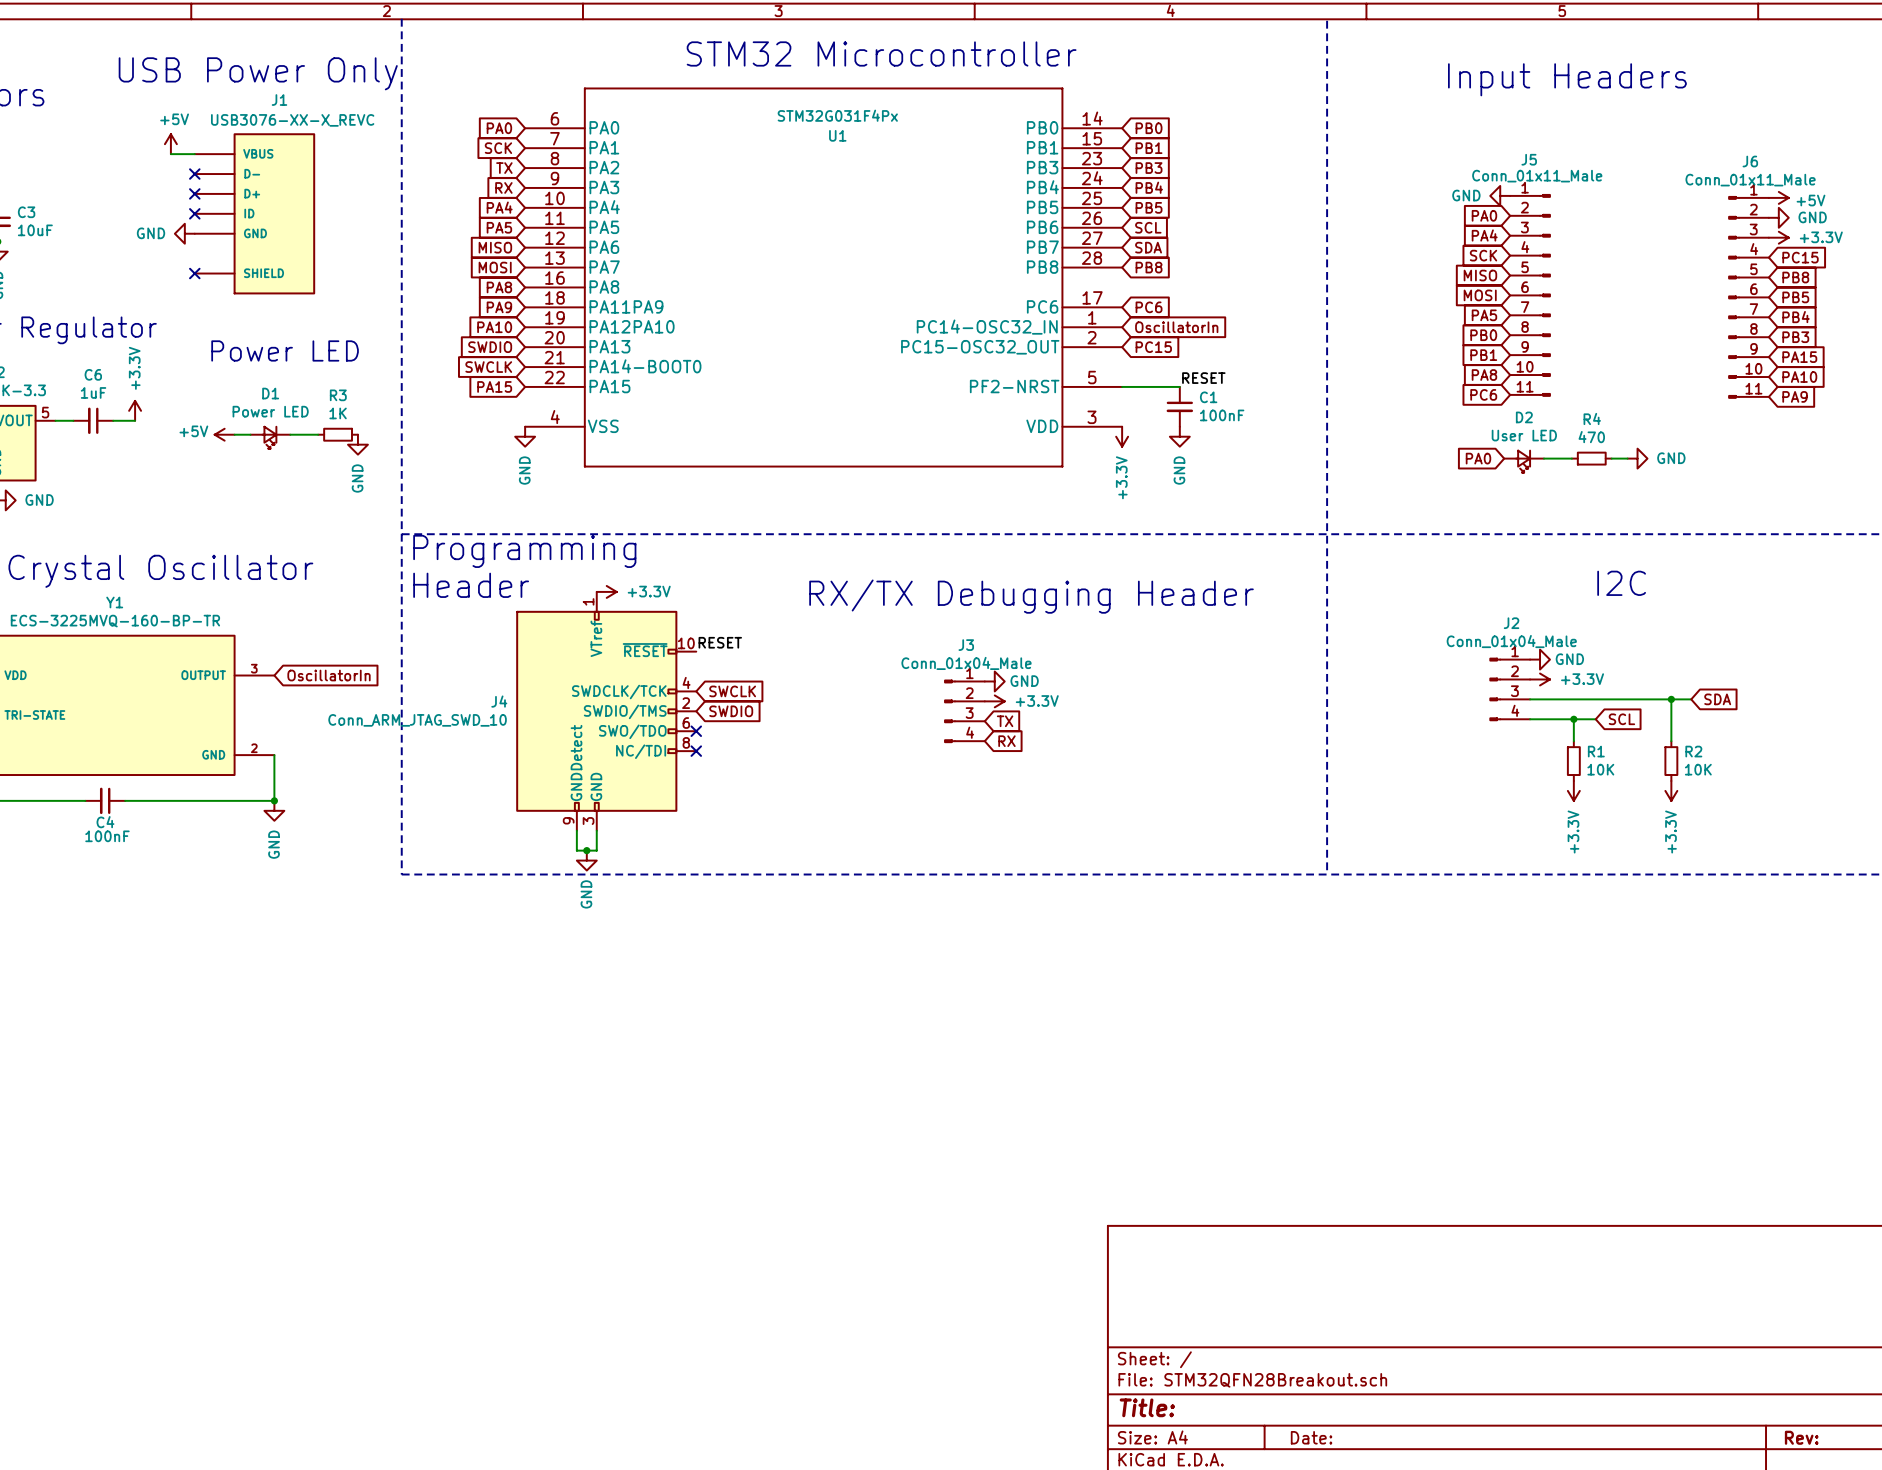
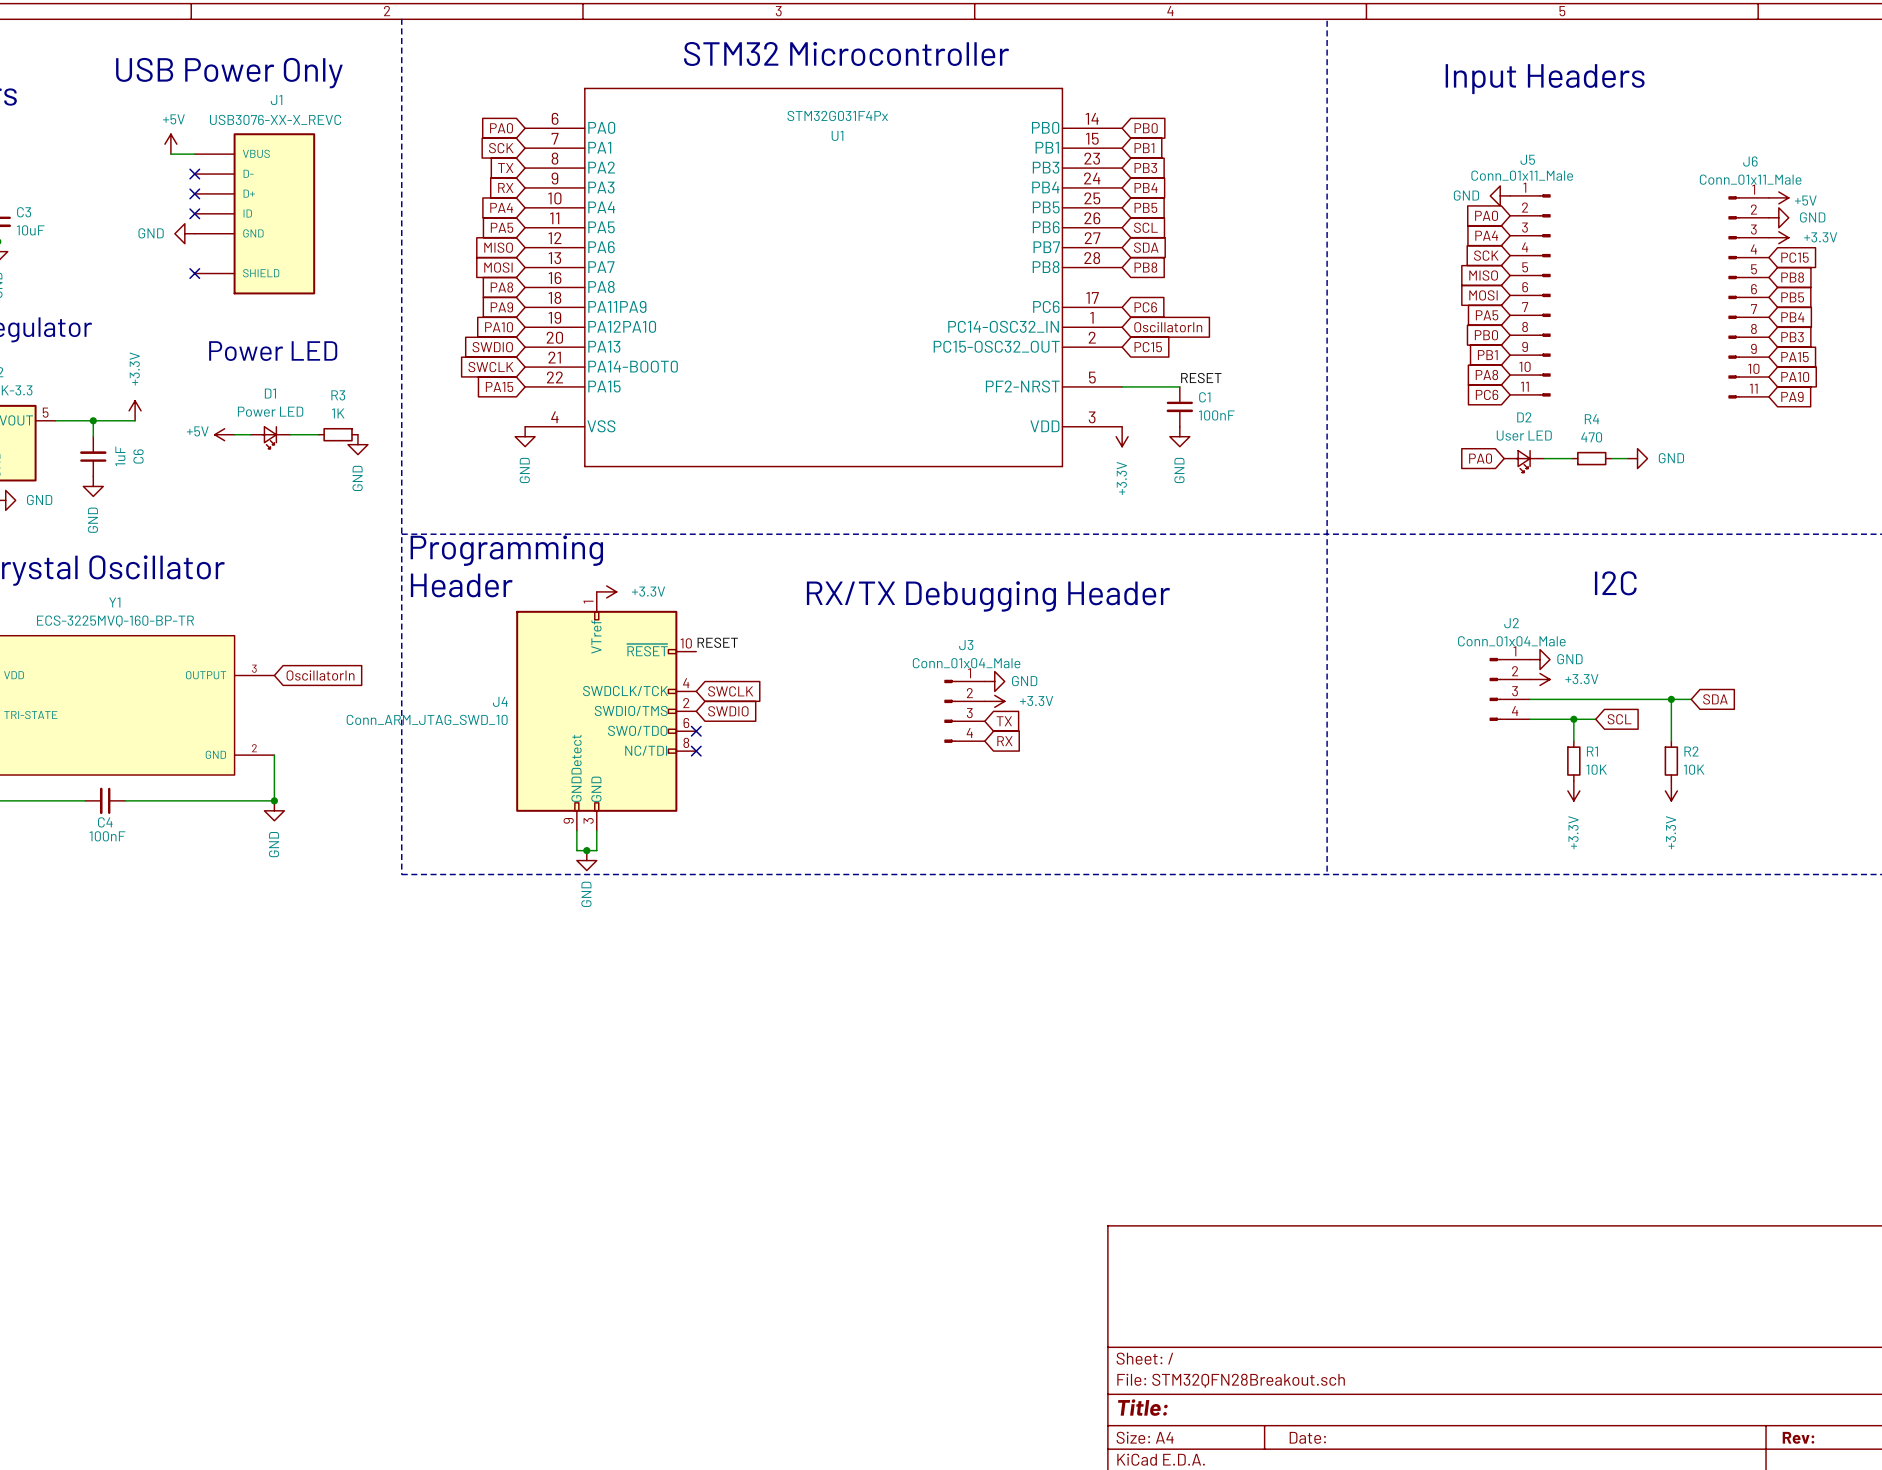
wire: none -> (93, 420) (93, 436)
C6 rotation: 0° (93, 420) -> 90° clockwise (93, 456)
C6 position: (93, 420) -> (93, 456)
junction: none -> (93, 420)
power symbol: none -> GND (93, 486)

